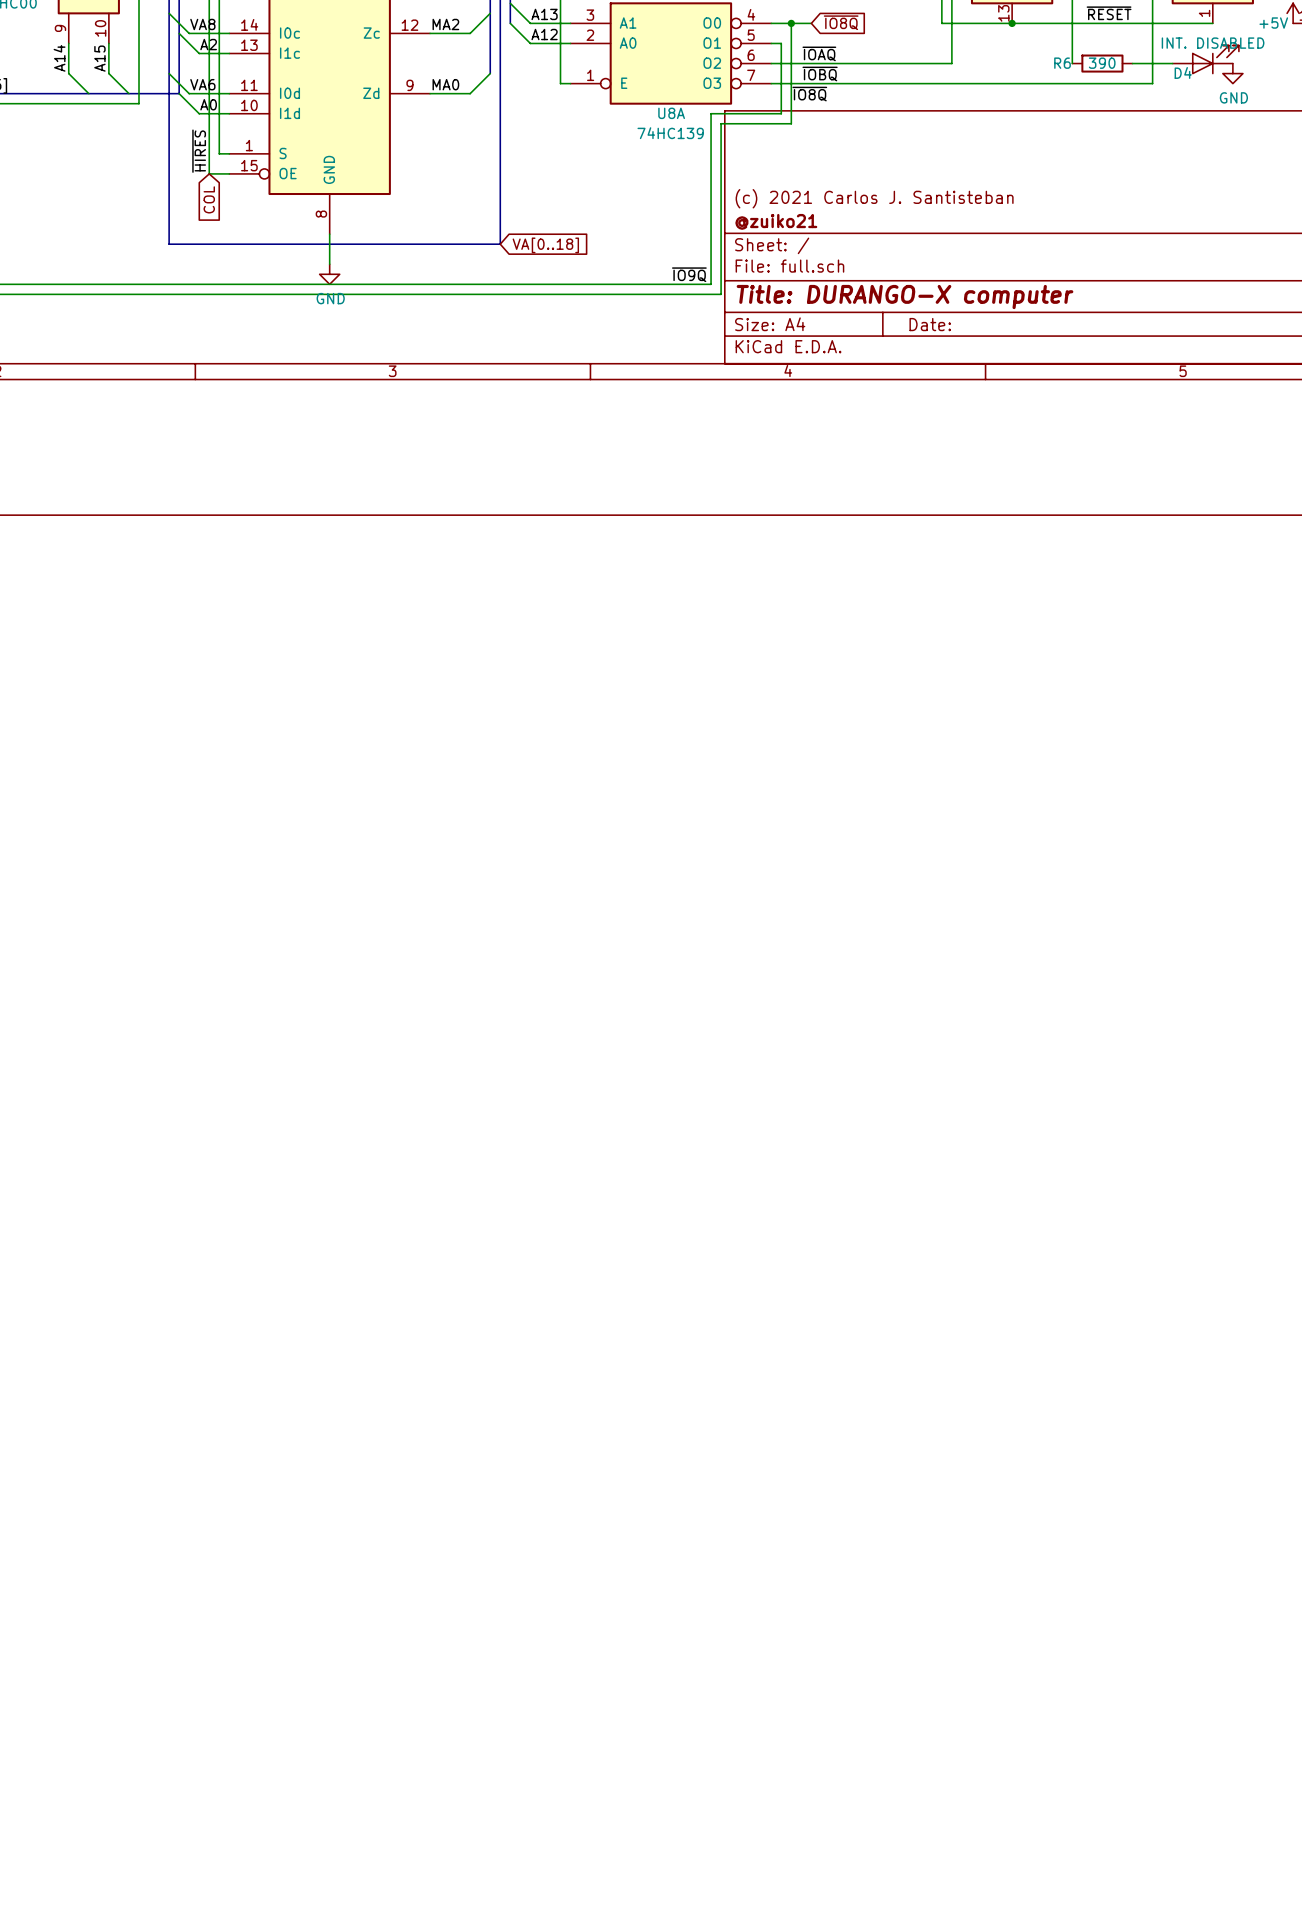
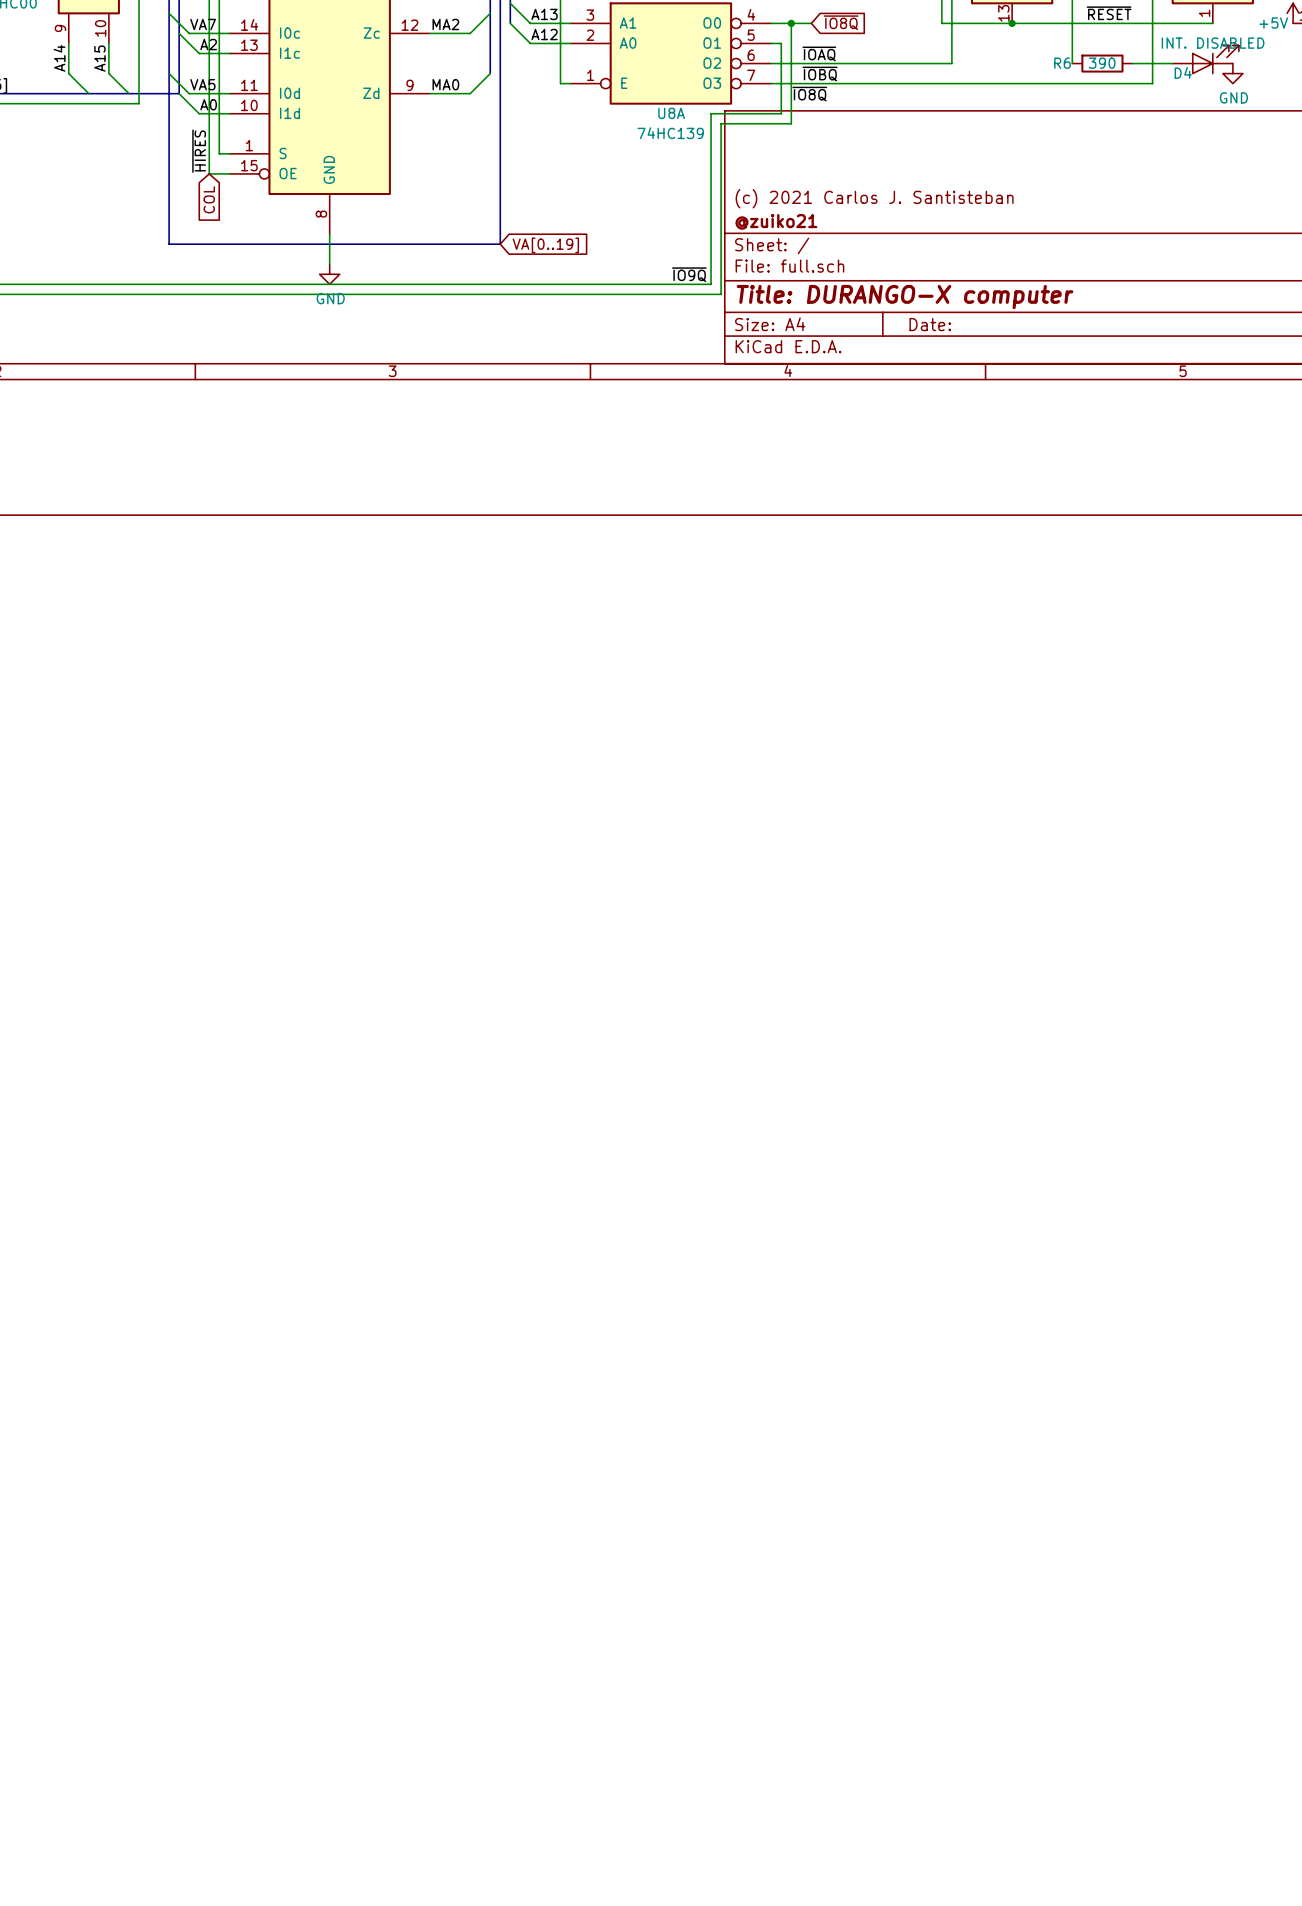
label: VA8 (202, 24) -> VA7 (203, 24)
label: VA6 (202, 84) -> VA5 (202, 84)
global label: VA[0..18] (545, 245) -> VA[0..19] (545, 245)

